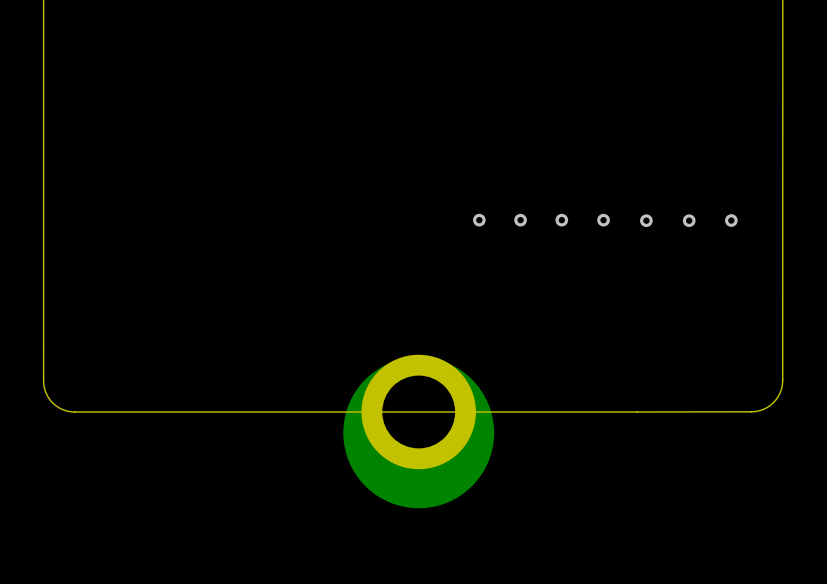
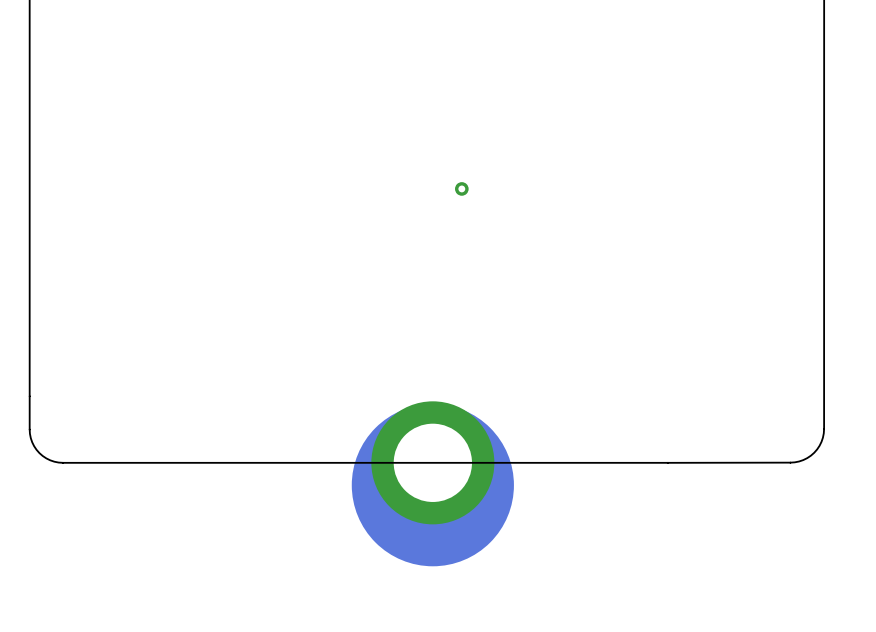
via: none -> (461, 188)
via: (479, 220) -> none
via: (520, 220) -> none
via: (561, 220) -> none
via: (603, 220) -> none
via: (646, 220) -> none
via: (689, 220) -> none
via: (731, 220) -> none

